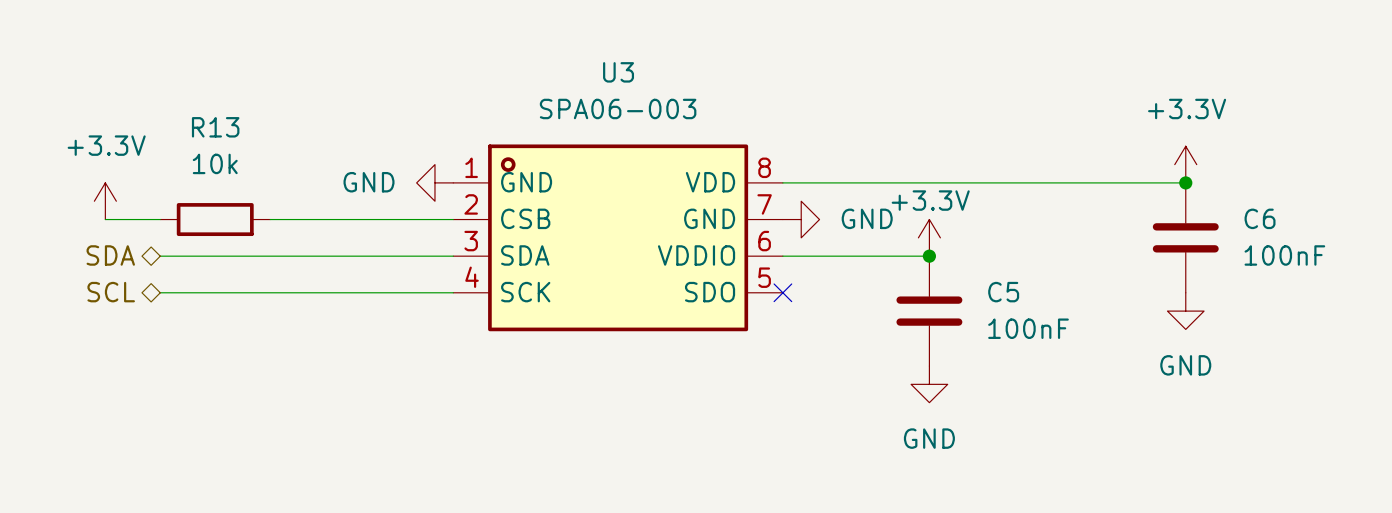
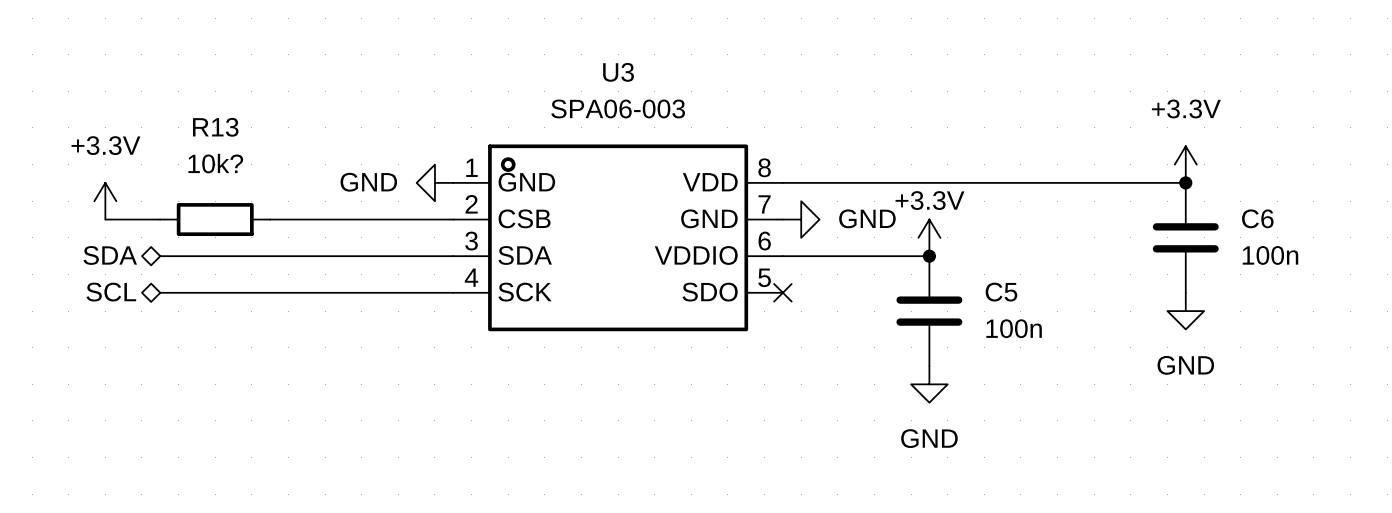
R13 value: 10k (215, 163) -> 10k? (215, 163)
C6 value: 100nF (1284, 255) -> 100n (1270, 255)
C5 value: 100nF (1028, 328) -> 100n (1014, 328)

